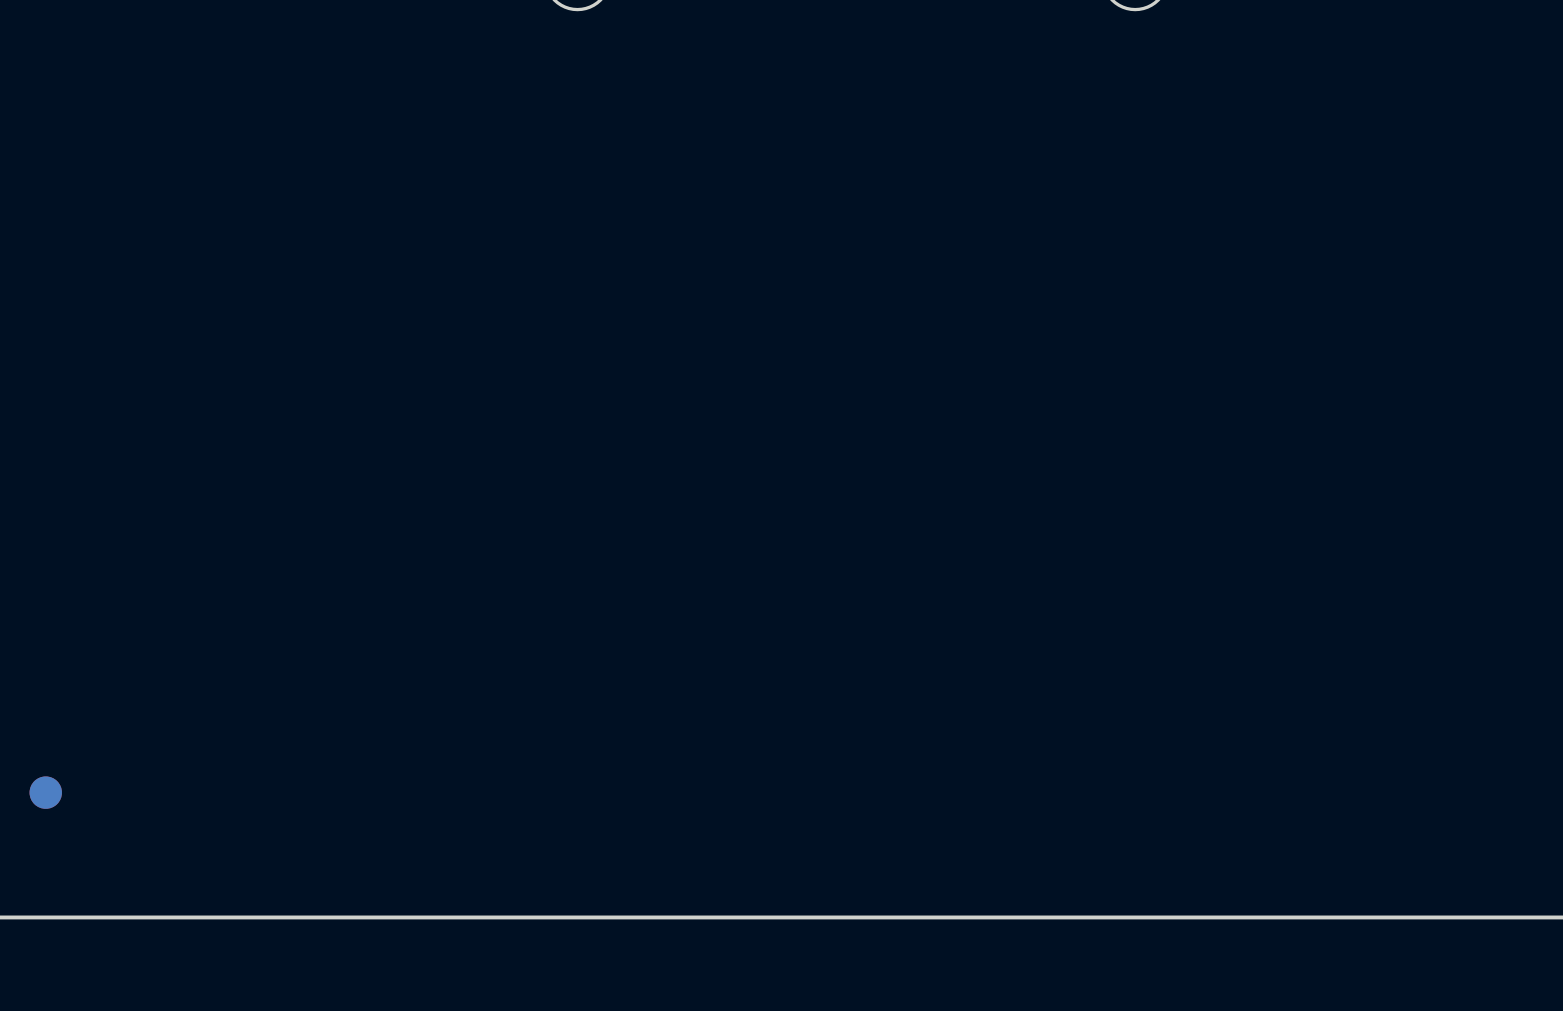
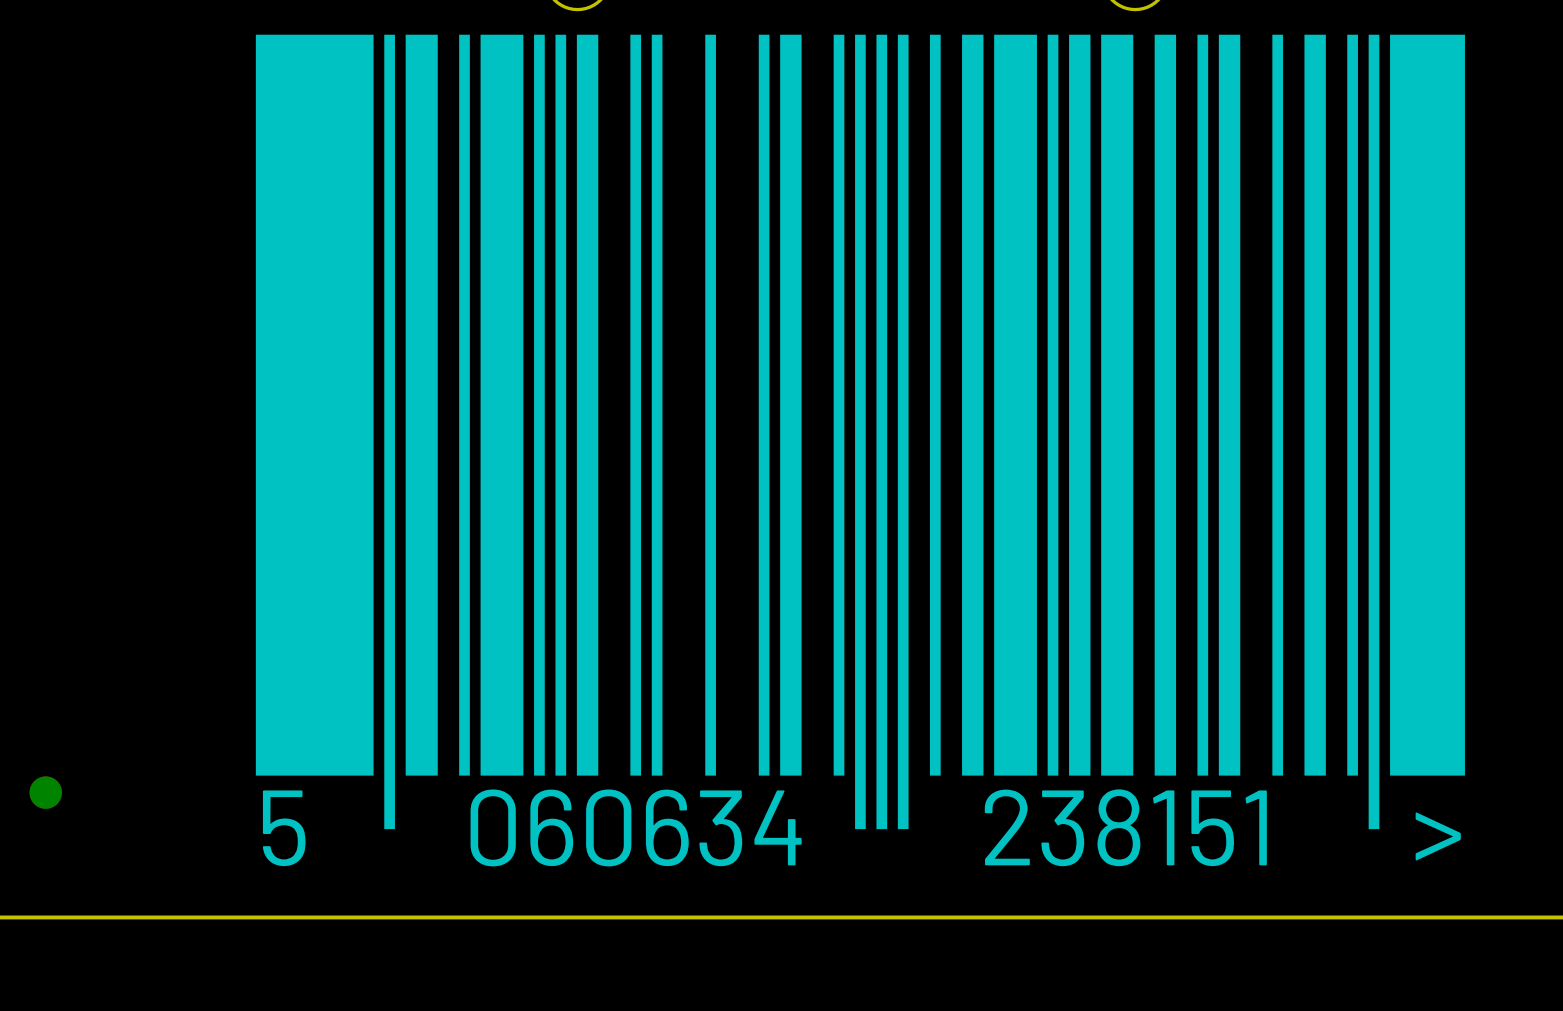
drawing: none -> [255, 34, 1465, 830]

